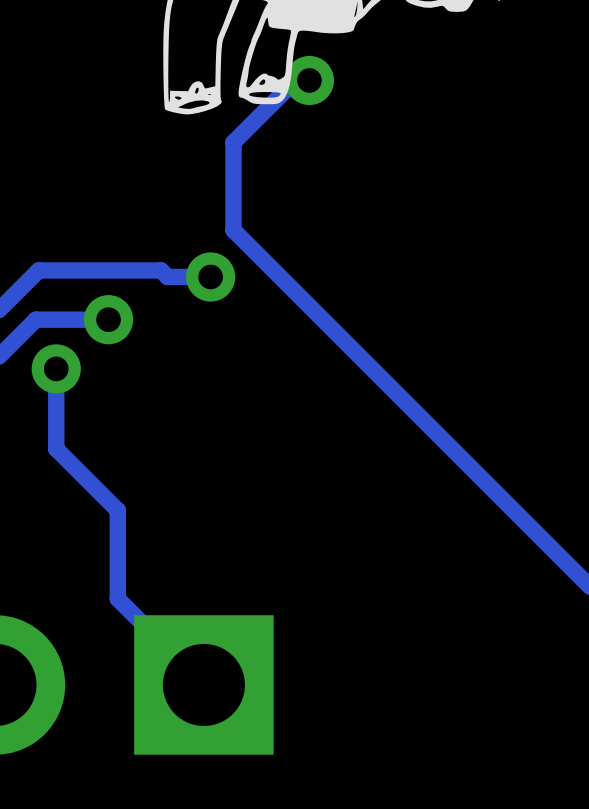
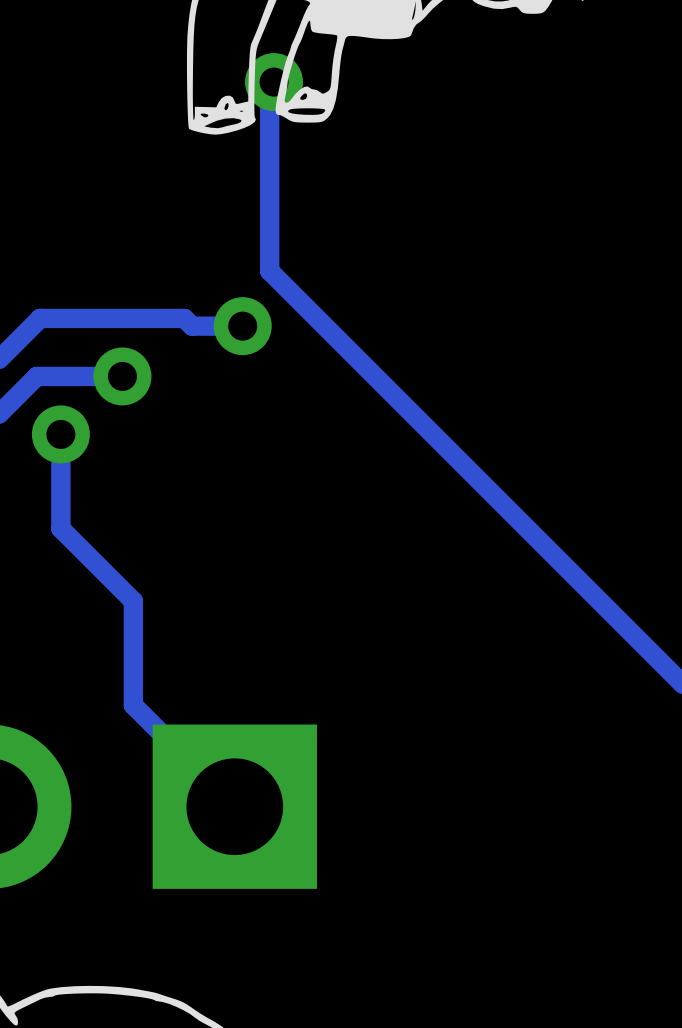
track: (309, 80) (295, 80) (233, 142) -> (274, 82) (269, 86) (269, 167)
via position: (309, 80) -> (274, 82)

